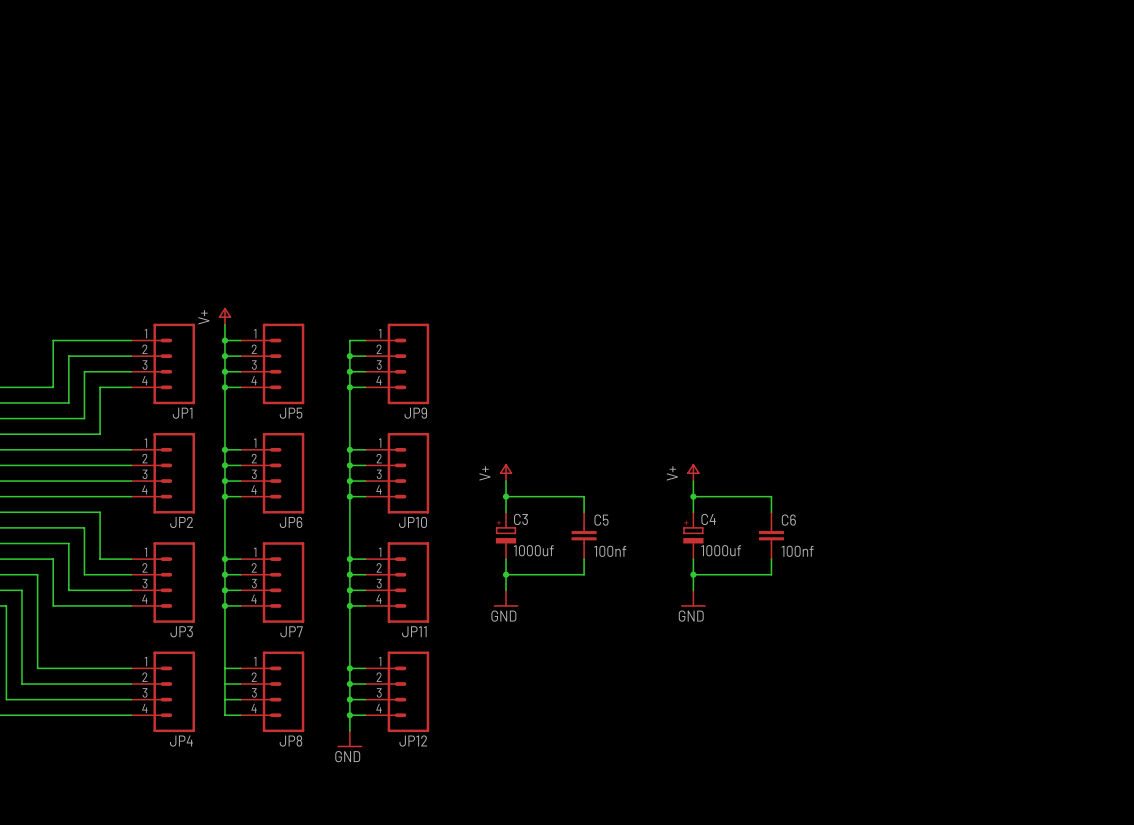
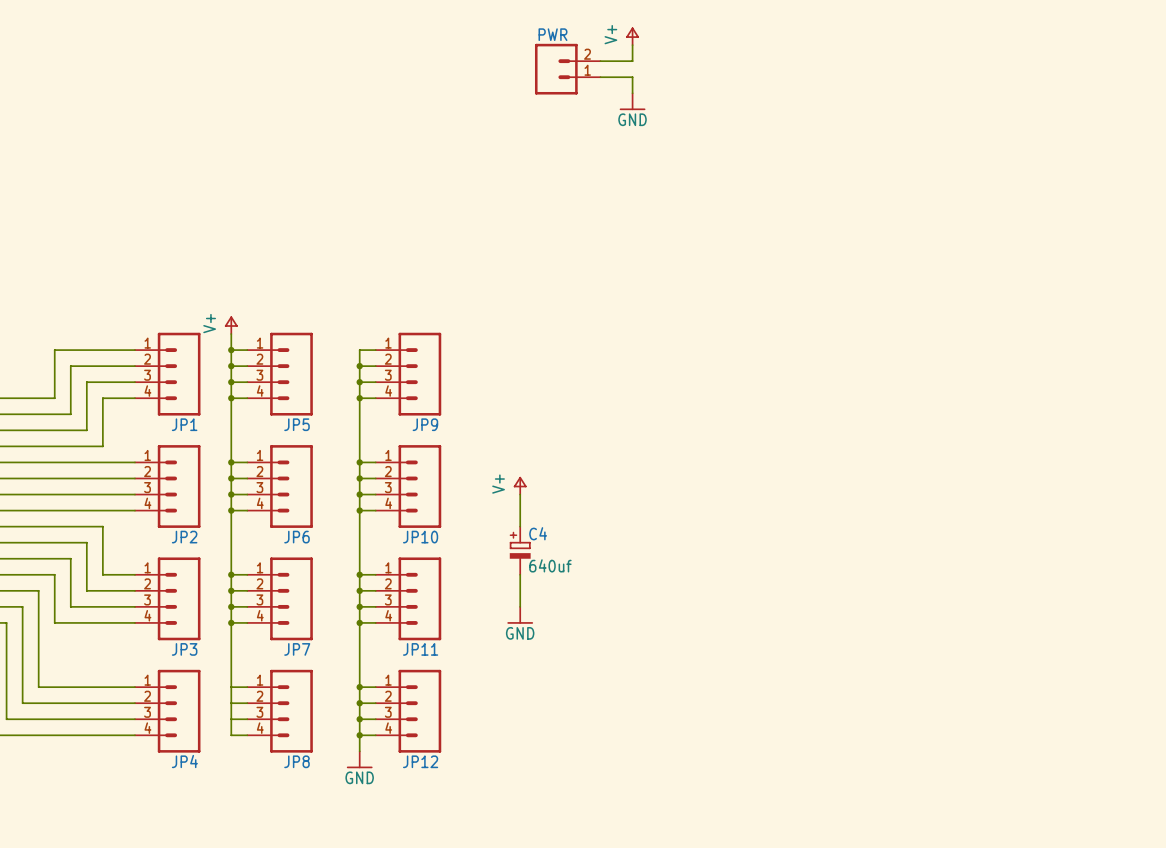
power symbol: none -> V+ (632, 36)
wire: none -> (632, 45) (632, 61) (600, 61)
PWR: none -> (567, 69)
wire: none -> (600, 77) (632, 77) (632, 93)
power symbol: none -> GND (632, 101)
power symbol: V+ (693, 472) -> none
wire: (693, 481) (693, 512) -> none
wire: (506, 496) (584, 496) (584, 512) -> none
junction: (506, 496) -> none
wire: (693, 496) (771, 496) (771, 512) -> none
junction: (693, 496) -> none
C3 name: C3 (520, 519) -> C4 (538, 533)
C5: 100nf (584, 535) -> none
C4: 1000uf (693, 535) -> none
C6: 100nf (771, 535) -> none
C3 value: 1000uf (533, 550) -> 640uf (550, 565)
wire: (584, 559) (584, 574) (506, 574) -> none
wire: (693, 559) (693, 590) -> none
wire: (771, 559) (771, 574) (693, 574) -> none
junction: (506, 574) -> none
junction: (693, 574) -> none
power symbol: GND (693, 598) -> none

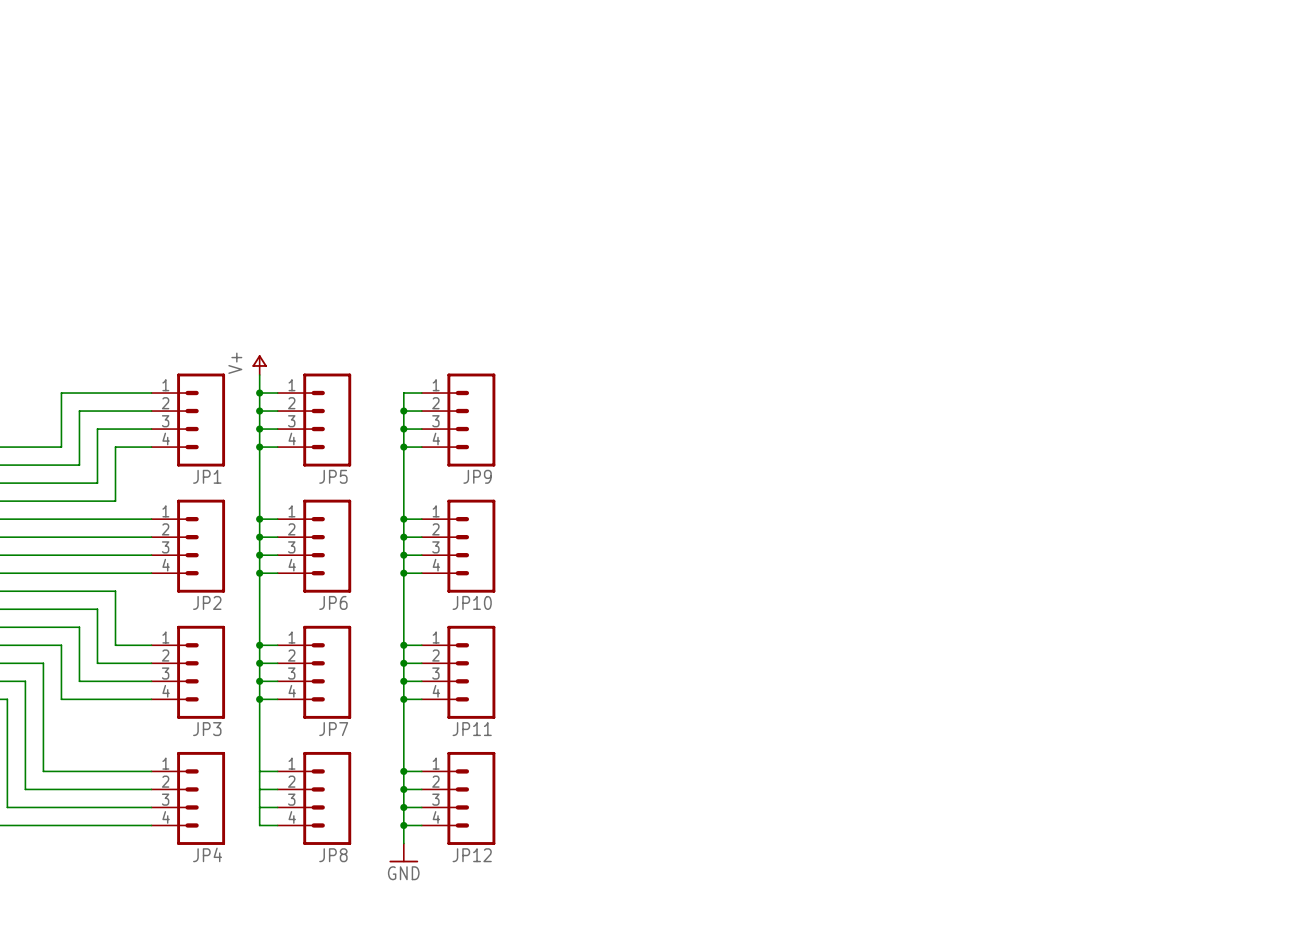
power symbol: V+ (632, 36) -> none
wire: (632, 45) (632, 61) (600, 61) -> none
PWR: (567, 69) -> none
wire: (600, 77) (632, 77) (632, 93) -> none
power symbol: GND (632, 101) -> none
power symbol: V+ (520, 485) -> none
wire: (520, 494) (520, 526) -> none
C4: 640uf (520, 550) -> none
wire: (520, 574) (520, 606) -> none
power symbol: GND (520, 615) -> none

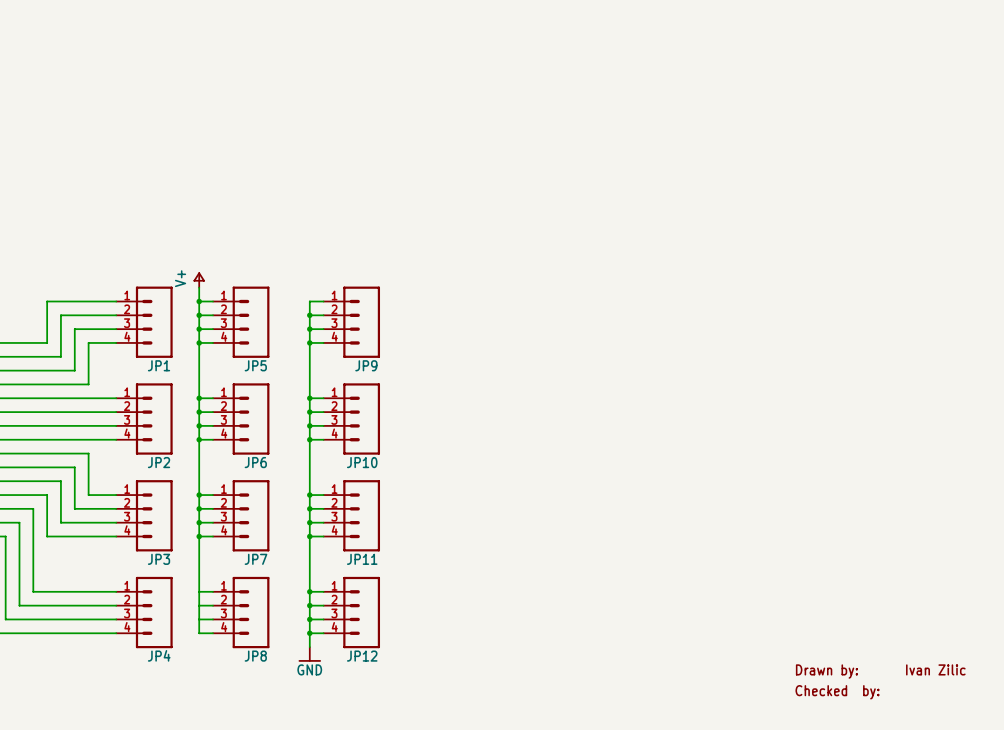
text: none -> Ivan Zilic (935, 669)
text: none -> Drawn by: (826, 671)
text: none -> Checked by: (837, 692)

